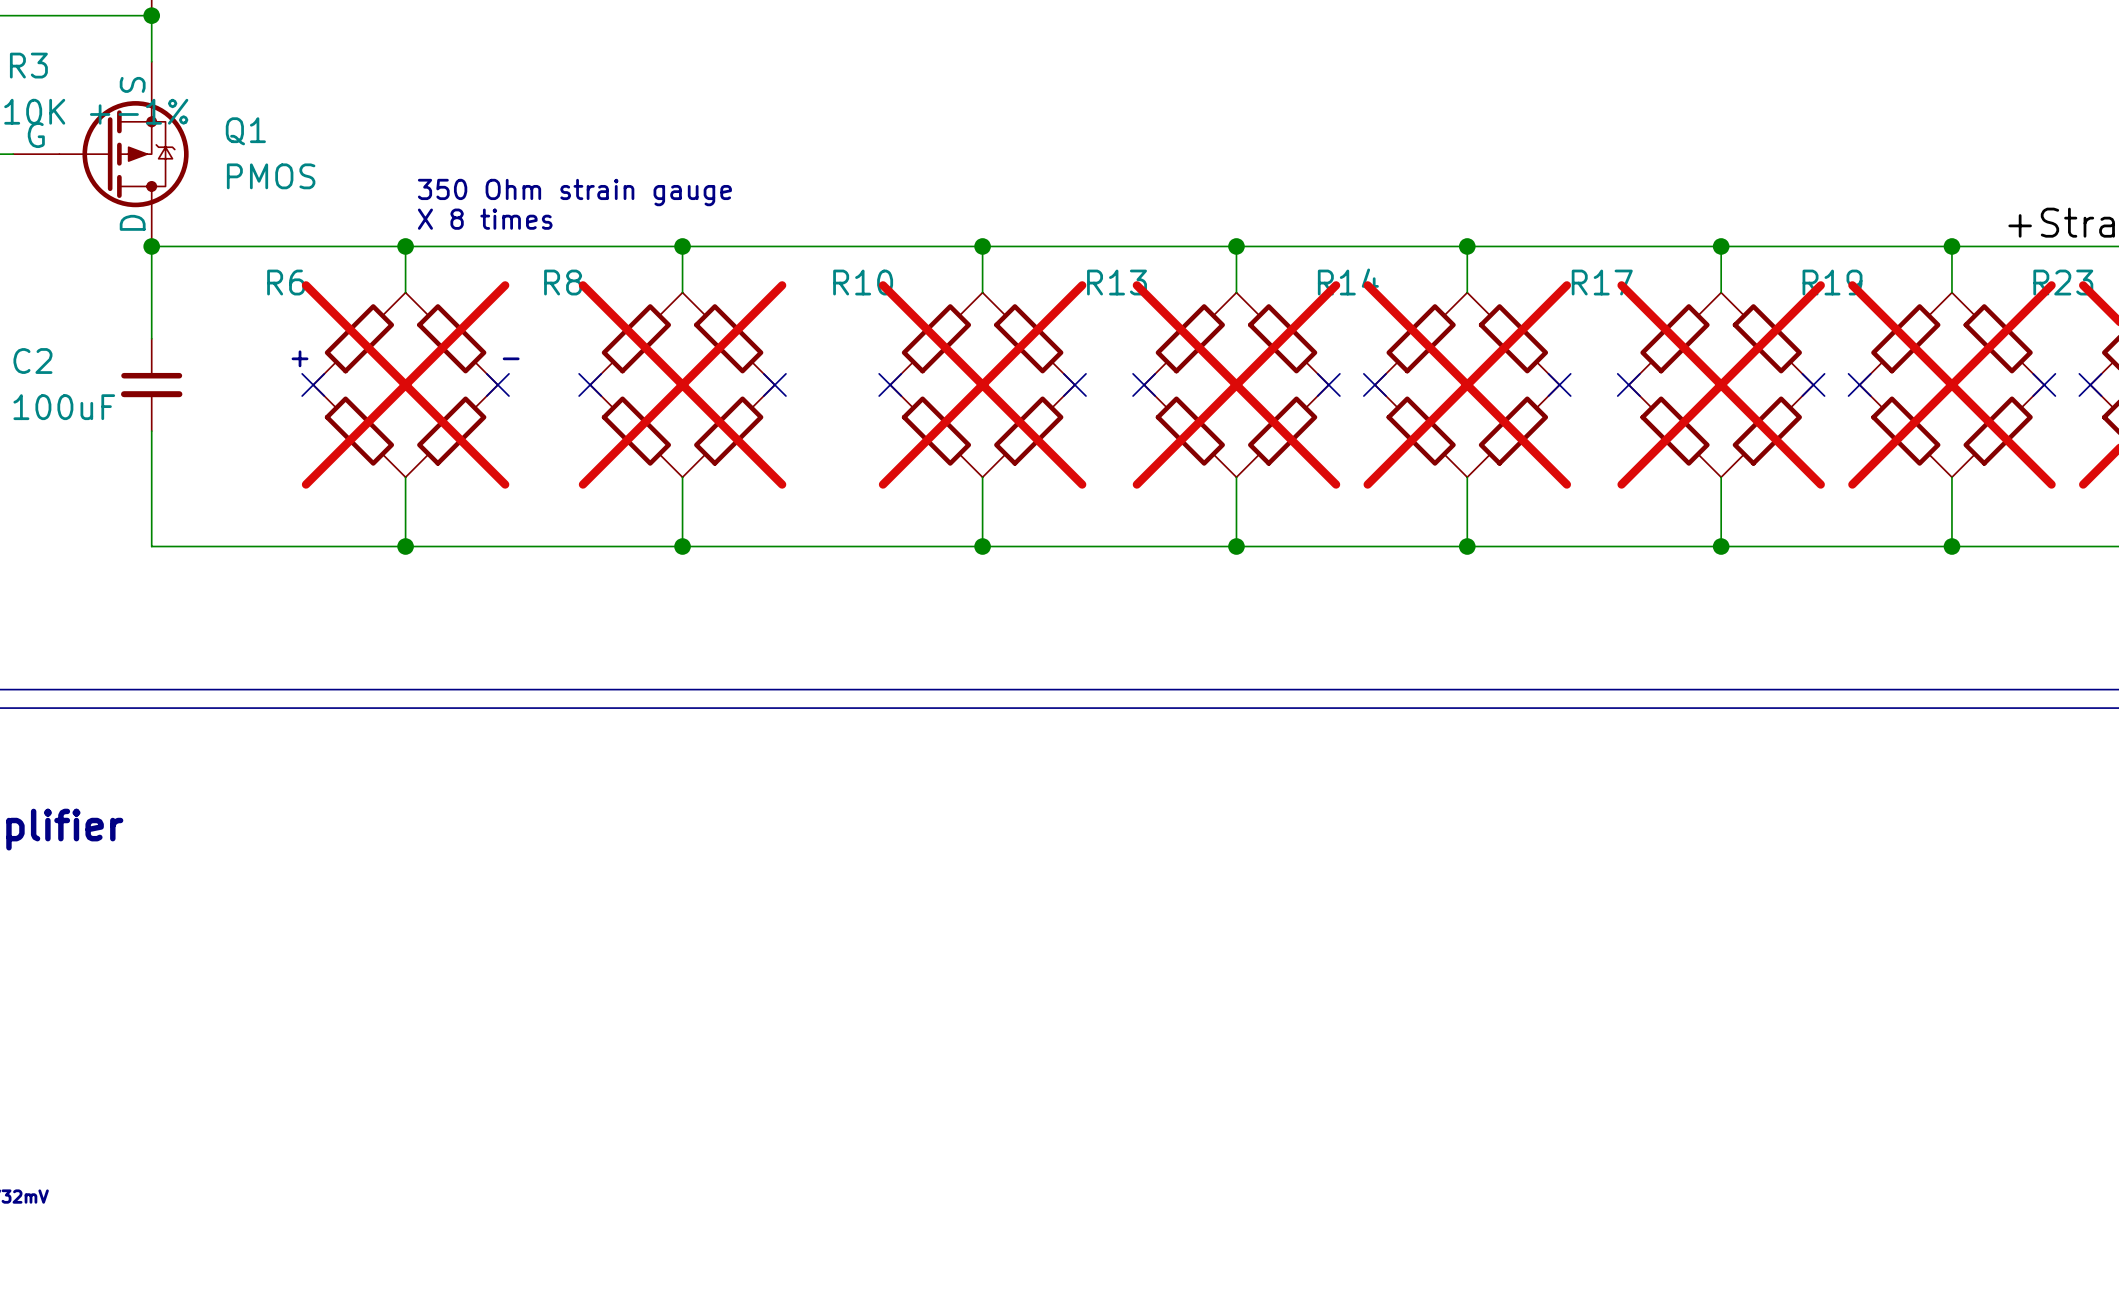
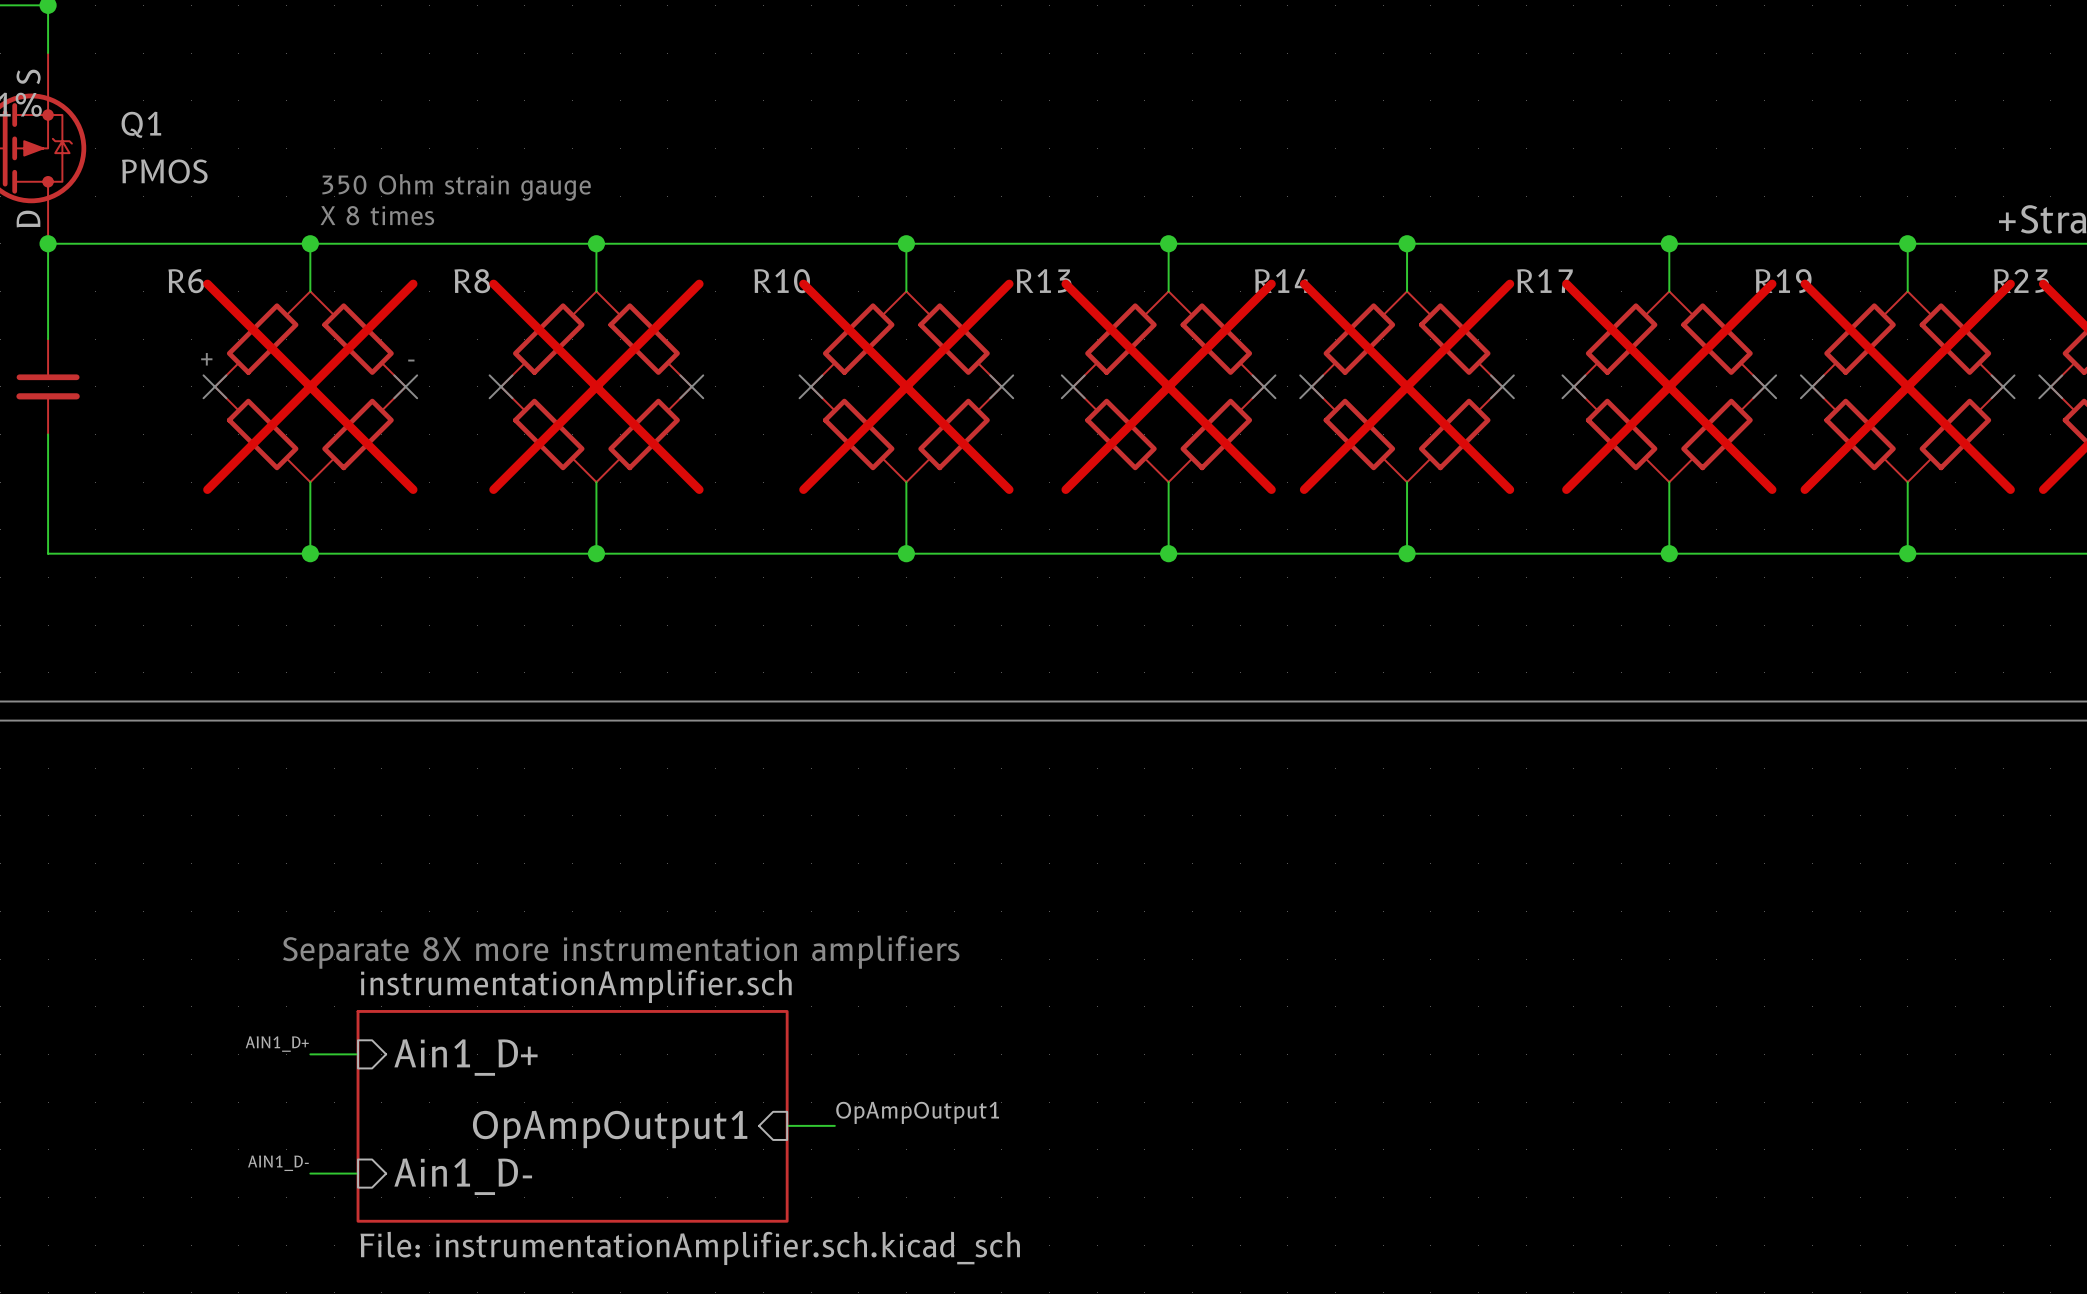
text: none -> Separate 8X more instrumentation amplifiers (621, 952)
label: none -> AIN1_D+ (277, 1044)
wire: none -> (310, 1054) (358, 1054)
sheet pin: none -> Ain1_D+ (465, 1057)
label: none -> OpAmpOutput1 (917, 1112)
sheet instrumentationAmplifier.sch: none -> File: instrumentationAmplifier.sch.kicad_sch (572, 1116)
wire: none -> (787, 1125) (834, 1125)
sheet pin: none -> OpAmpOutput1 (610, 1129)
label: none -> AIN1_D- (278, 1163)
wire: none -> (310, 1173) (358, 1173)
sheet pin: none -> Ain1_D- (463, 1176)

